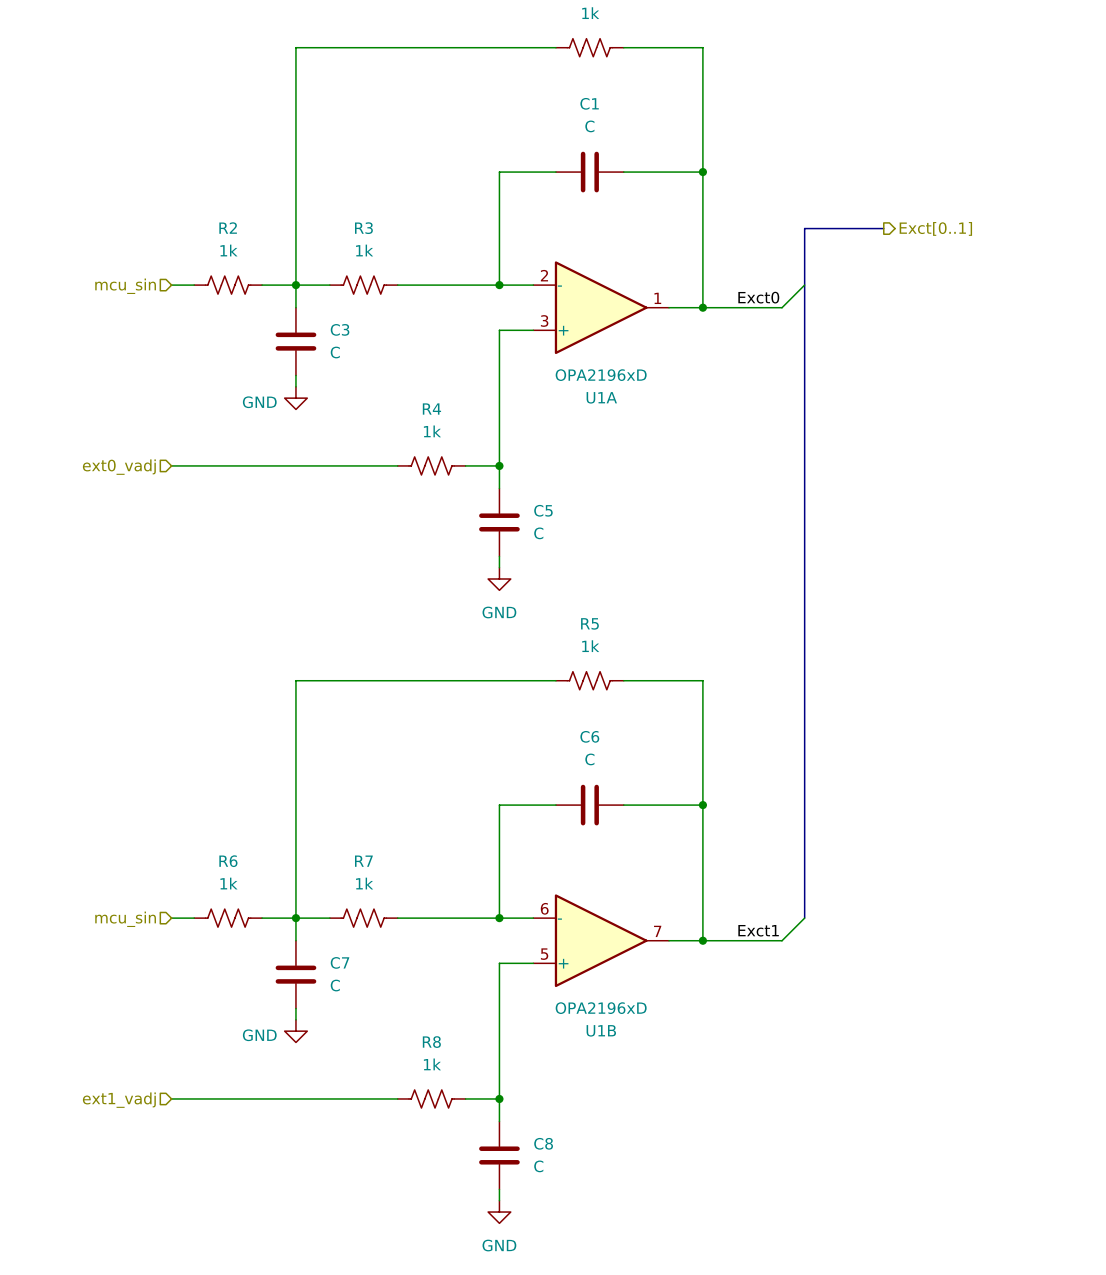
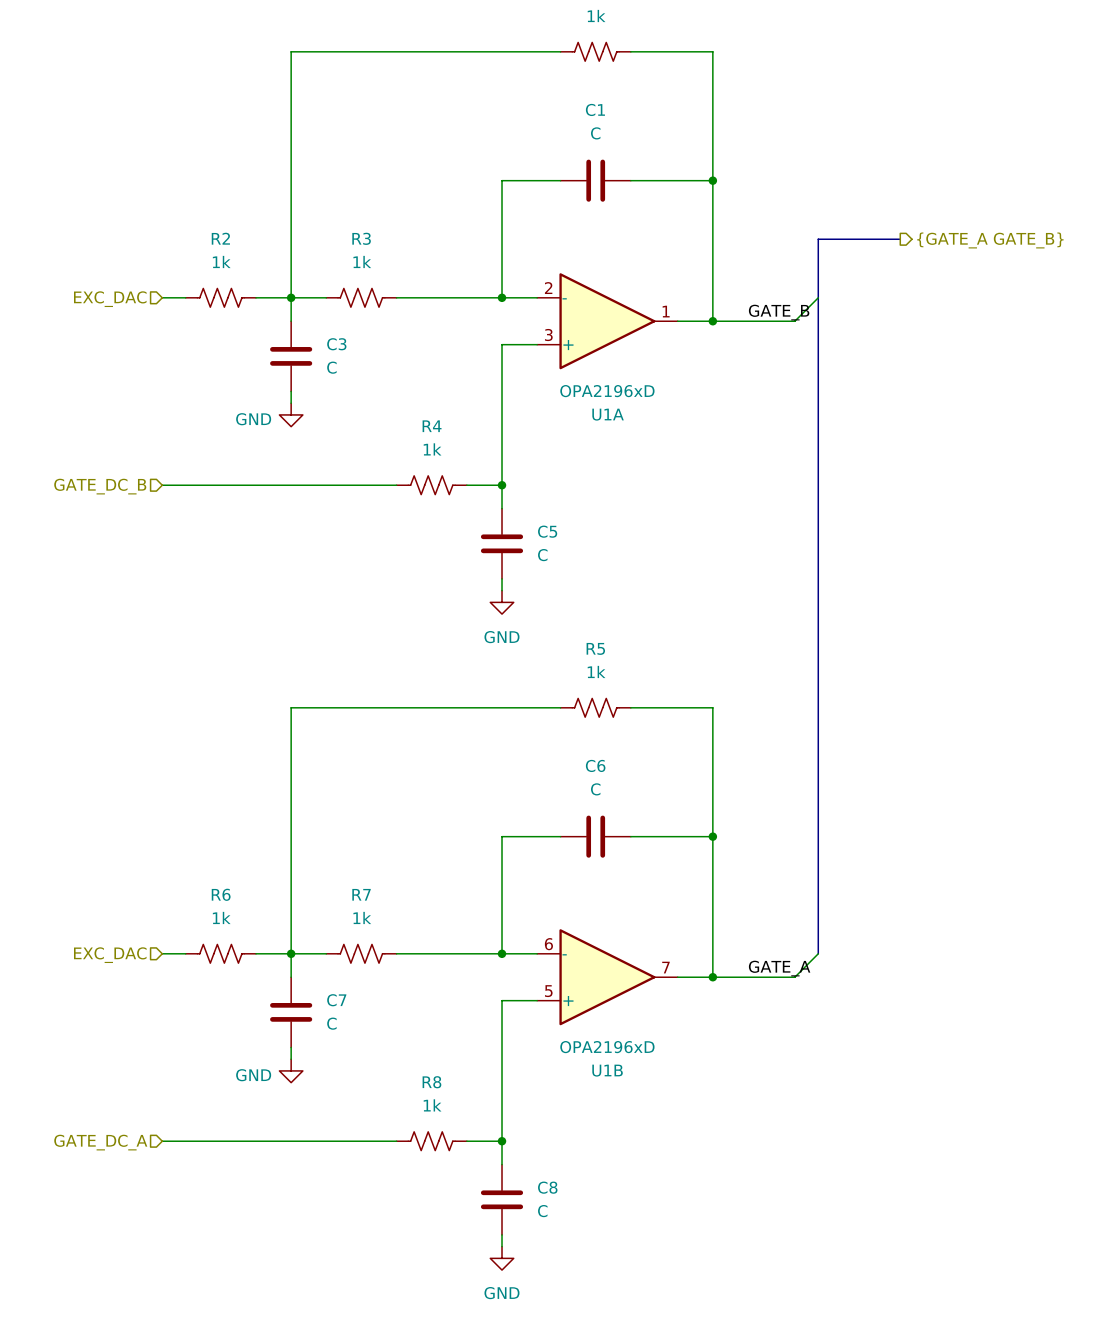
hierarchical label: Exct[0..1] (935, 228) -> {GATE_A GATE_B} (990, 240)
hierarchical label: mcu_sin (125, 286) -> EXC_DAC (110, 299)
label: Exct0 (758, 297) -> GATE_B (779, 312)
hierarchical label: ext0_vadj (119, 467) -> GATE_DC_B (100, 486)
hierarchical label: mcu_sin (125, 919) -> EXC_DAC (110, 955)
label: Exct1 (758, 930) -> GATE_A (779, 968)
hierarchical label: ext1_vadj (119, 1100) -> GATE_DC_A (100, 1142)

